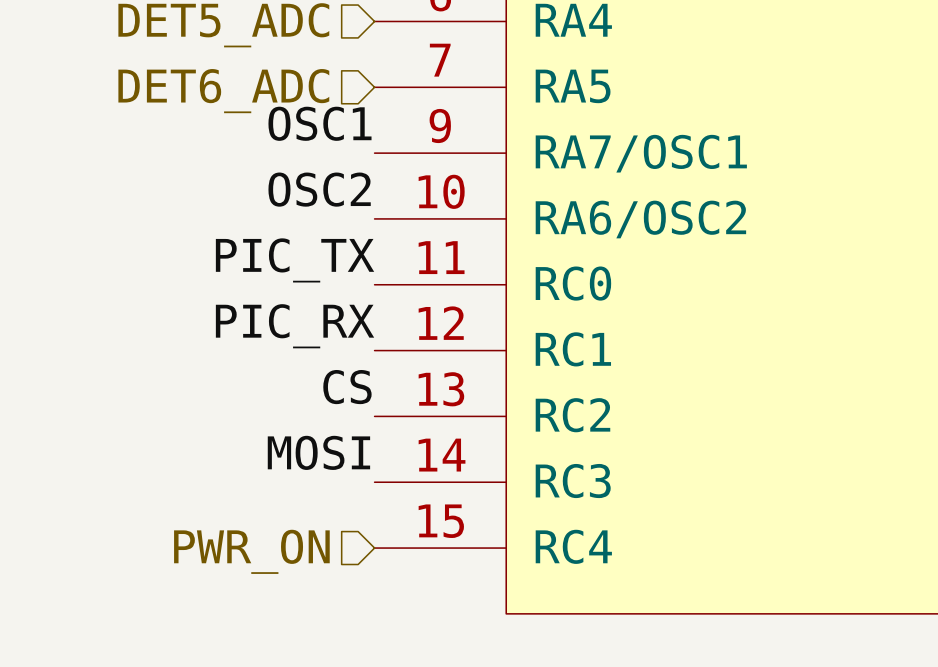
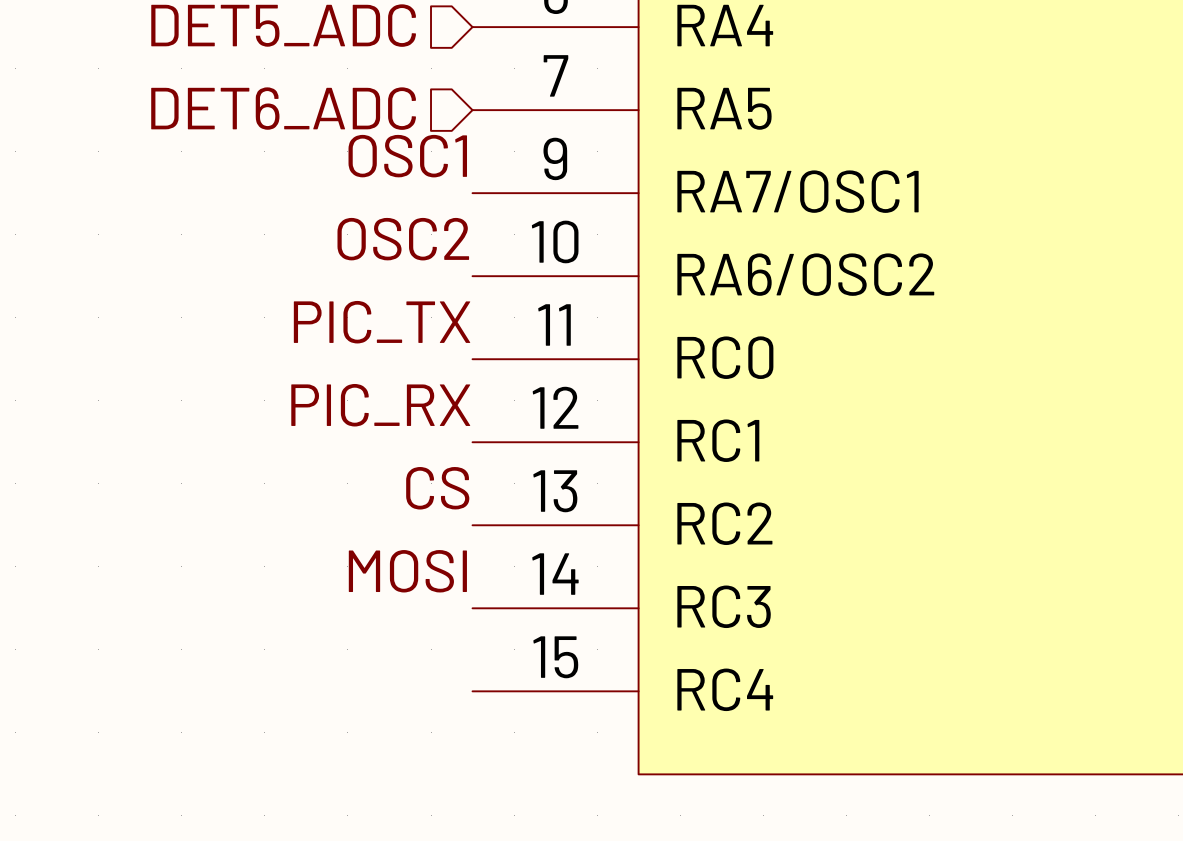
hierarchical label: PWR_ON (251, 551) -> none

